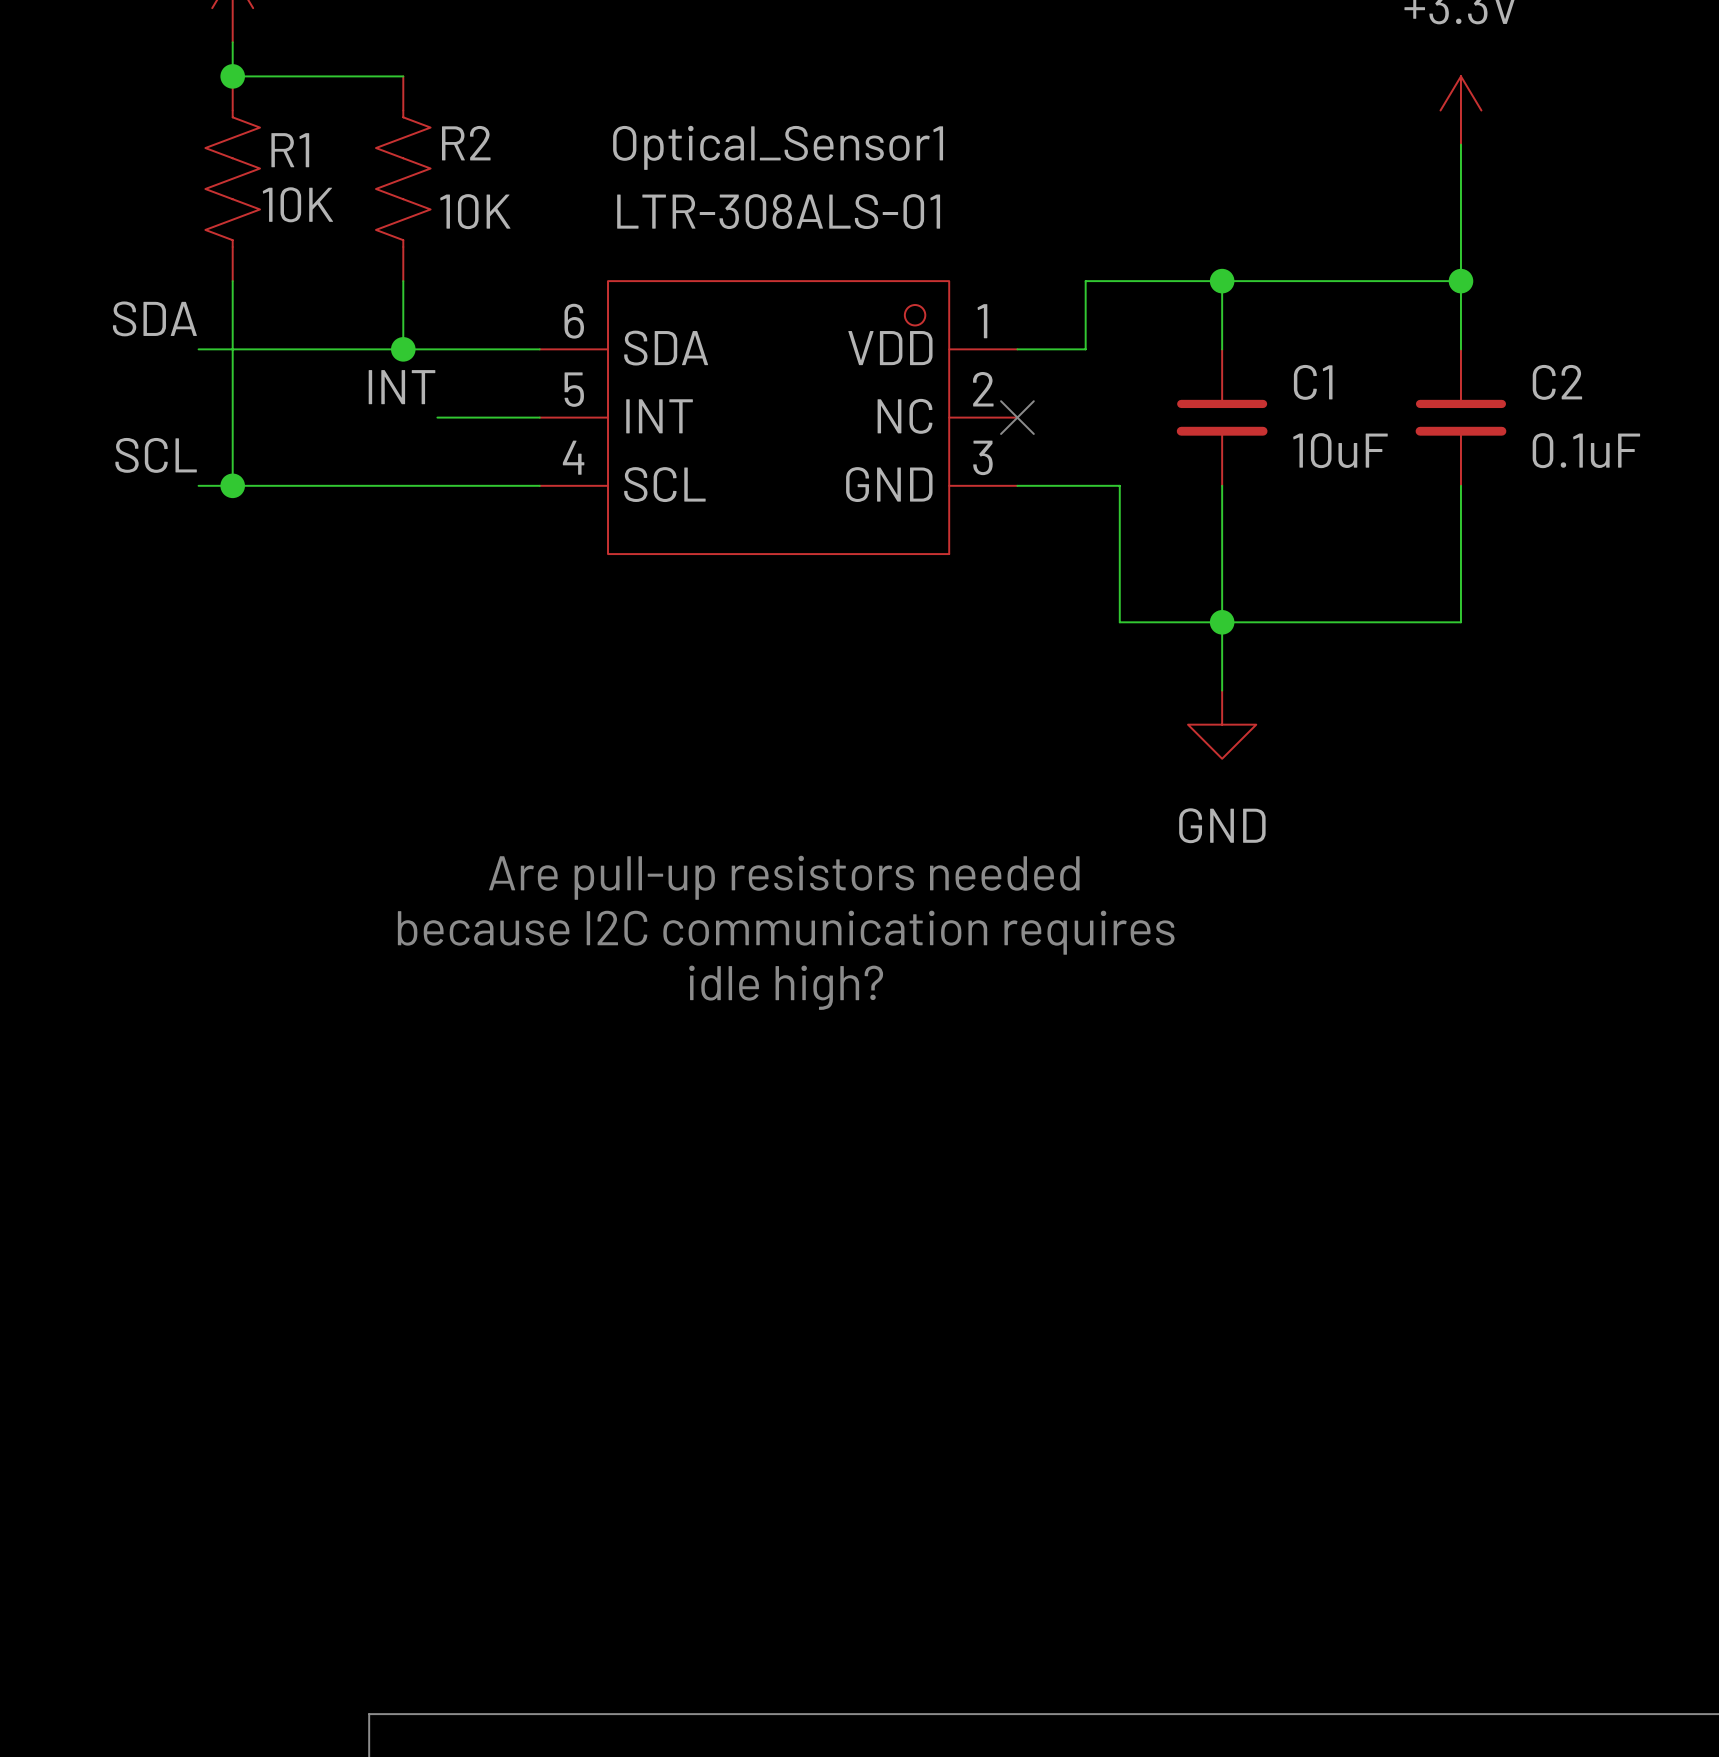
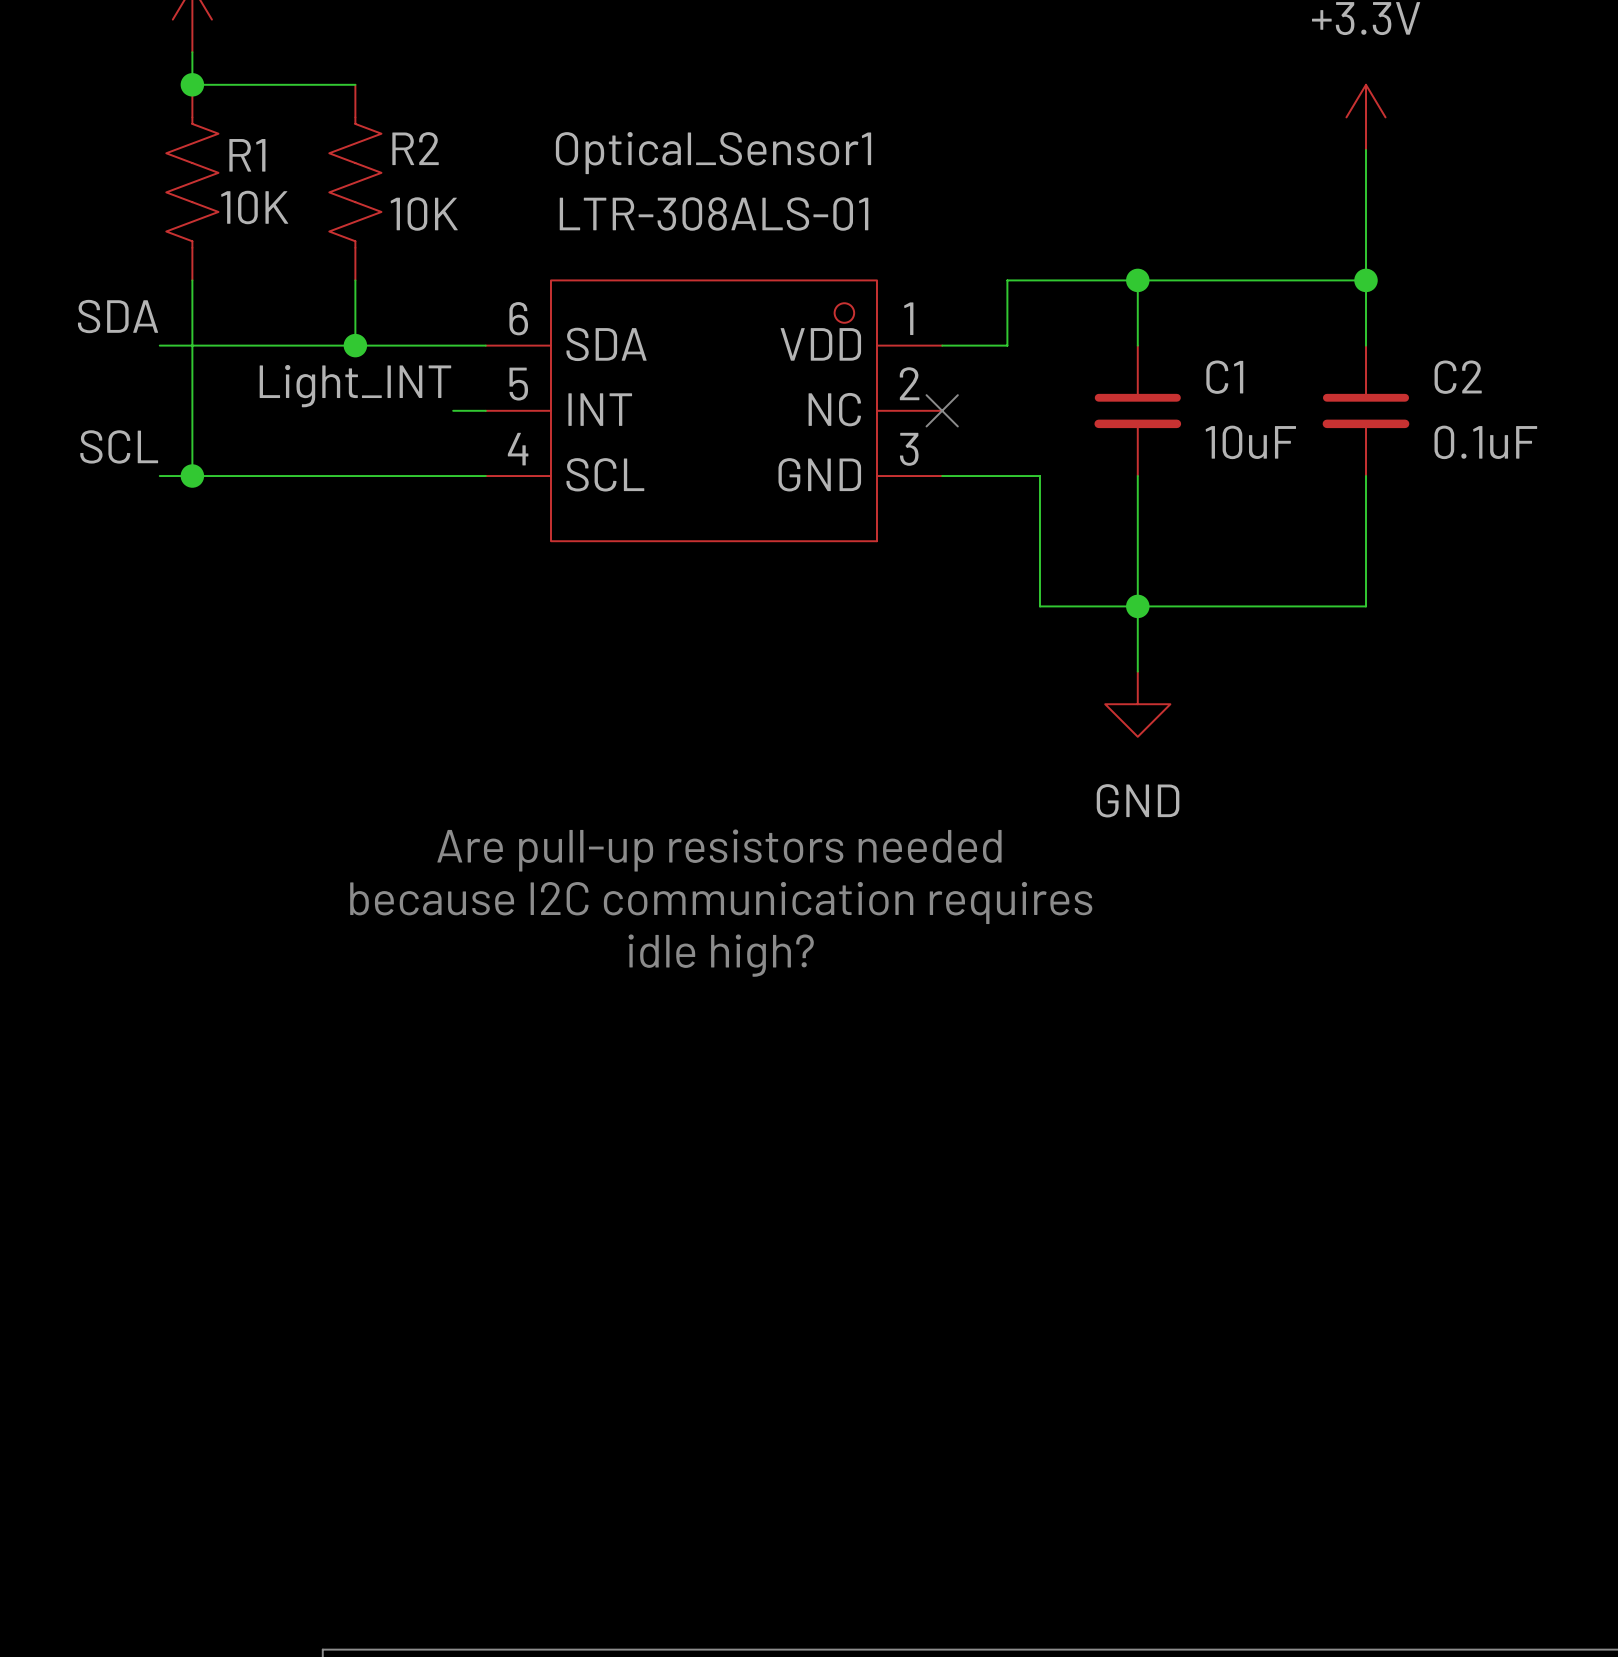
label: INT (402, 387) -> none
label: none -> Light_INT (355, 386)
wire: (437, 417) (505, 417) -> none

